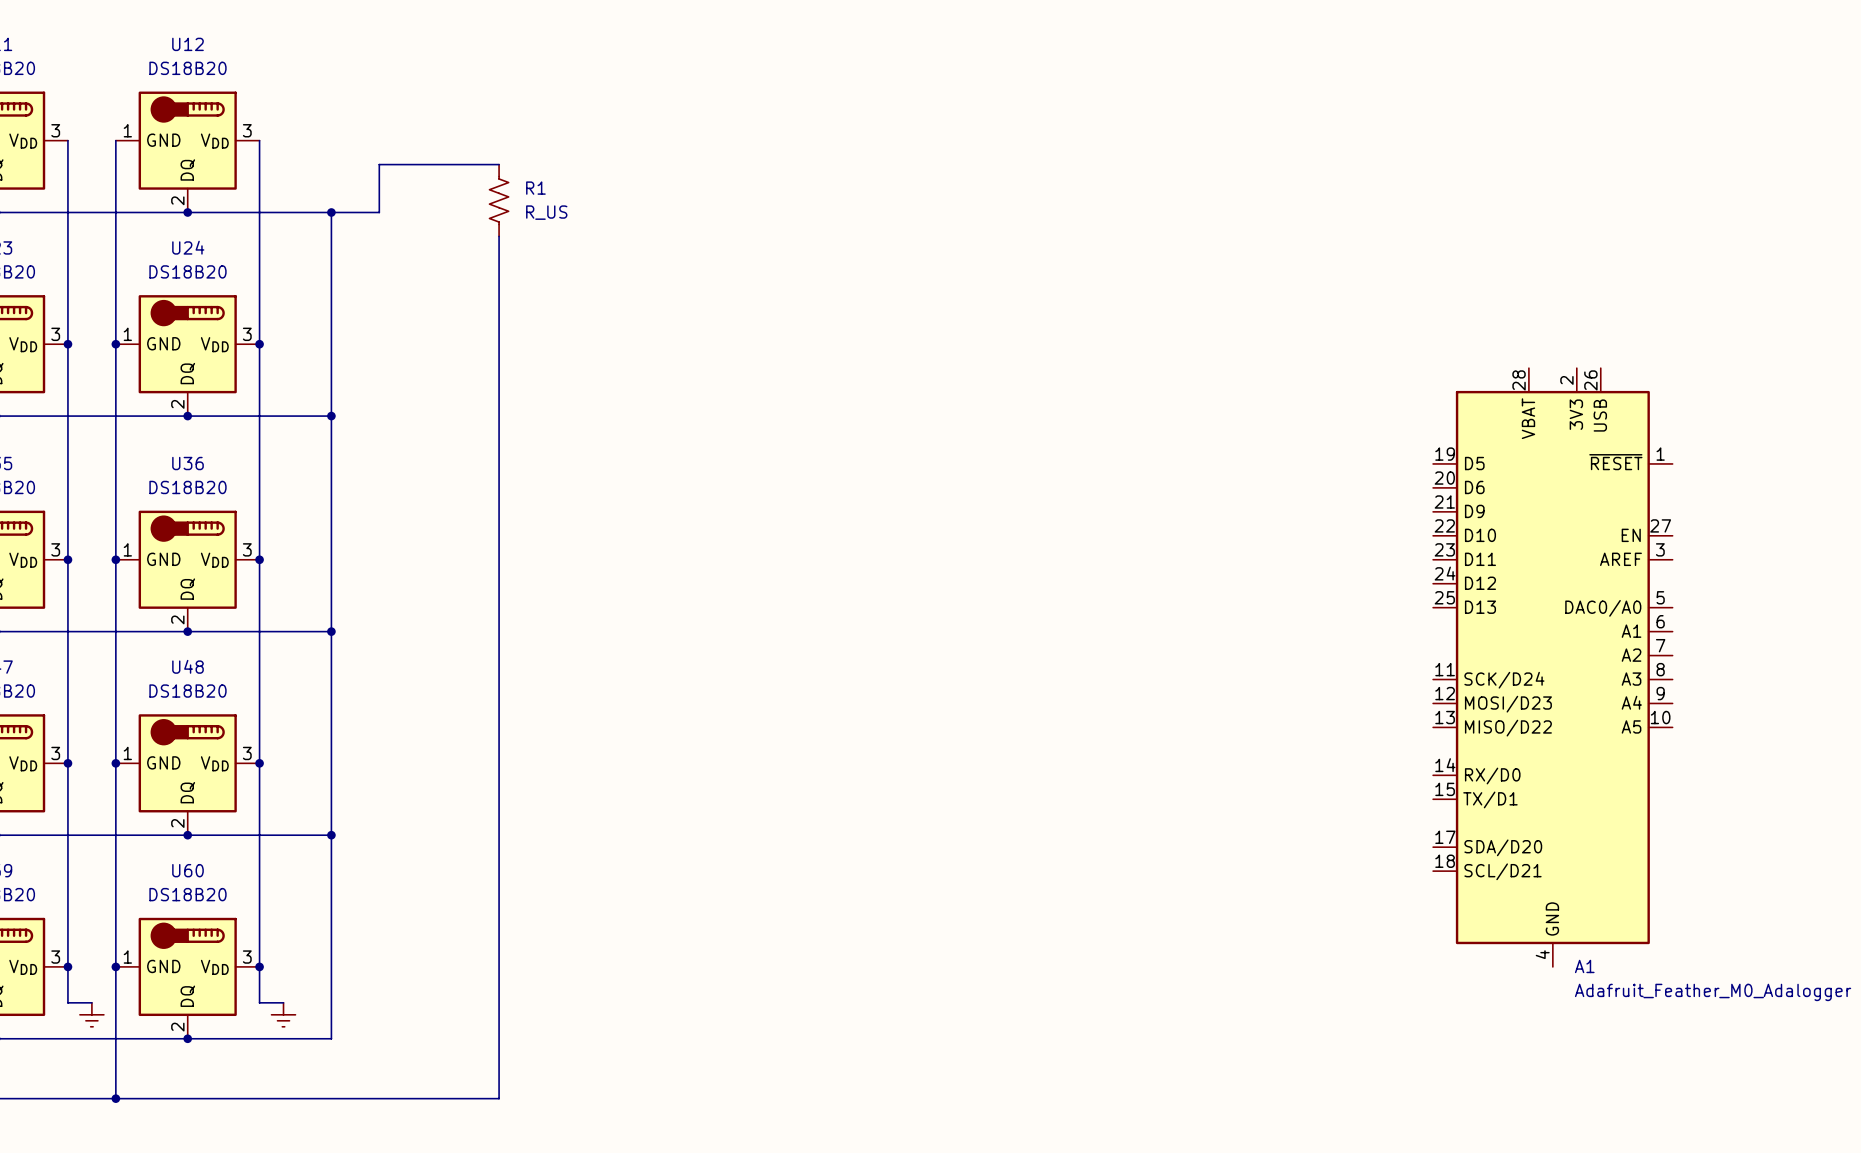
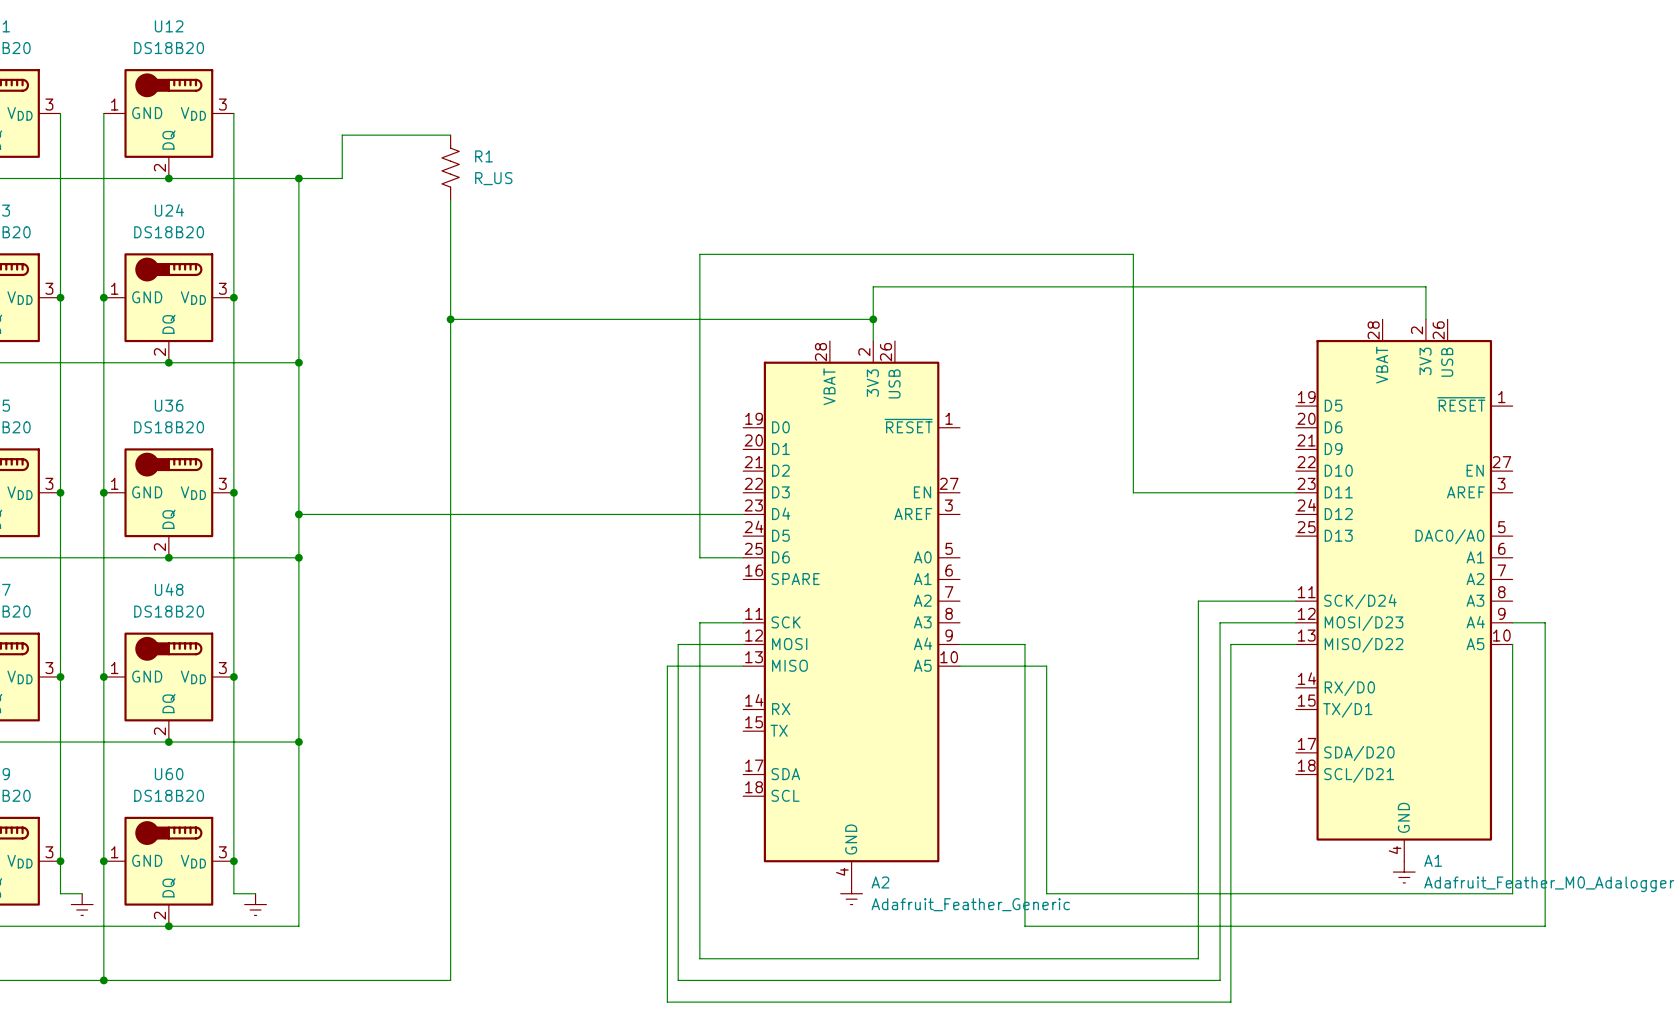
wire: none -> (450, 319) (873, 319)
junction: none -> (450, 319)
junction: none -> (873, 319)
wire: none -> (1425, 319) (1425, 286) (873, 286) (873, 341)
wire: none -> (1295, 492) (1133, 492) (1133, 254) (699, 254) (699, 557) (743, 557)
wire: none -> (298, 514) (743, 514)
junction: none -> (298, 514)
wire: none -> (1295, 601) (1198, 601) (1198, 958) (699, 958) (699, 622) (743, 622)
A2: none -> Adafruit_Feather_Generic (851, 611)
wire: none -> (1295, 622) (1220, 622) (1220, 980) (678, 980) (678, 644) (743, 644)
wire: none -> (1512, 622) (1545, 622) (1545, 926) (1024, 926) (1024, 644) (959, 644)
wire: none -> (1295, 644) (1230, 644) (1230, 1002) (667, 1002) (667, 666) (743, 666)
wire: none -> (1512, 644) (1512, 893) (1046, 893) (1046, 666) (959, 666)
power symbol: none -> (1404, 872)
power symbol: none -> (851, 893)

